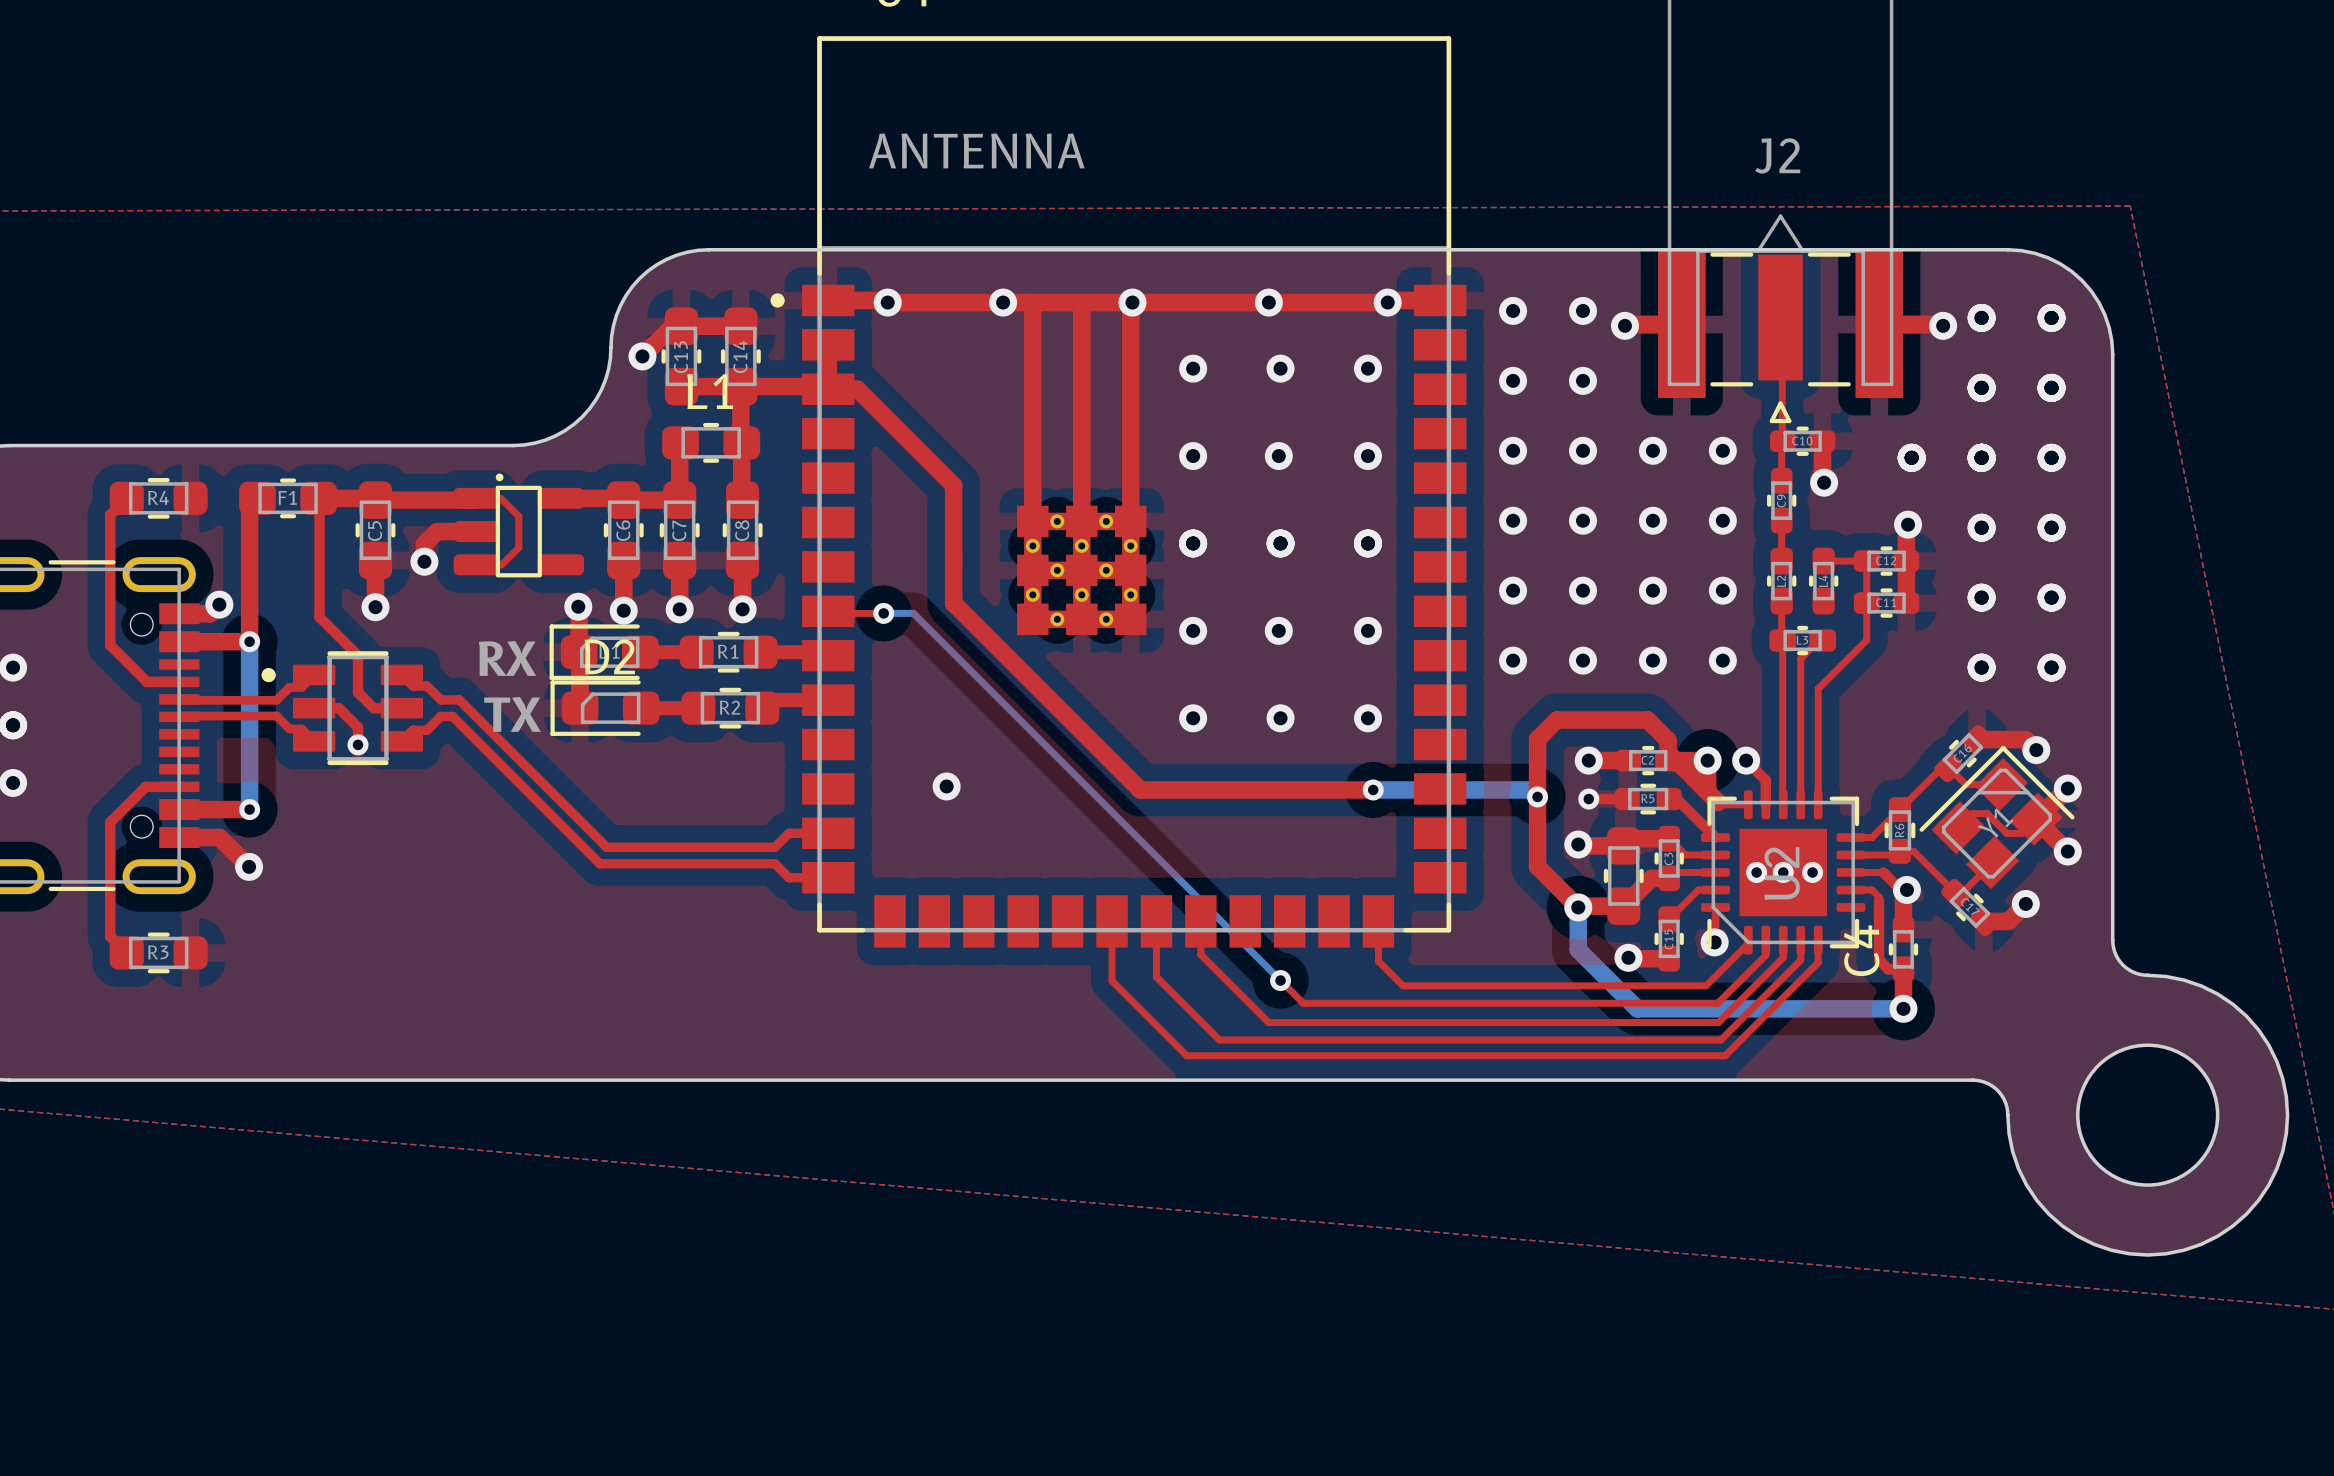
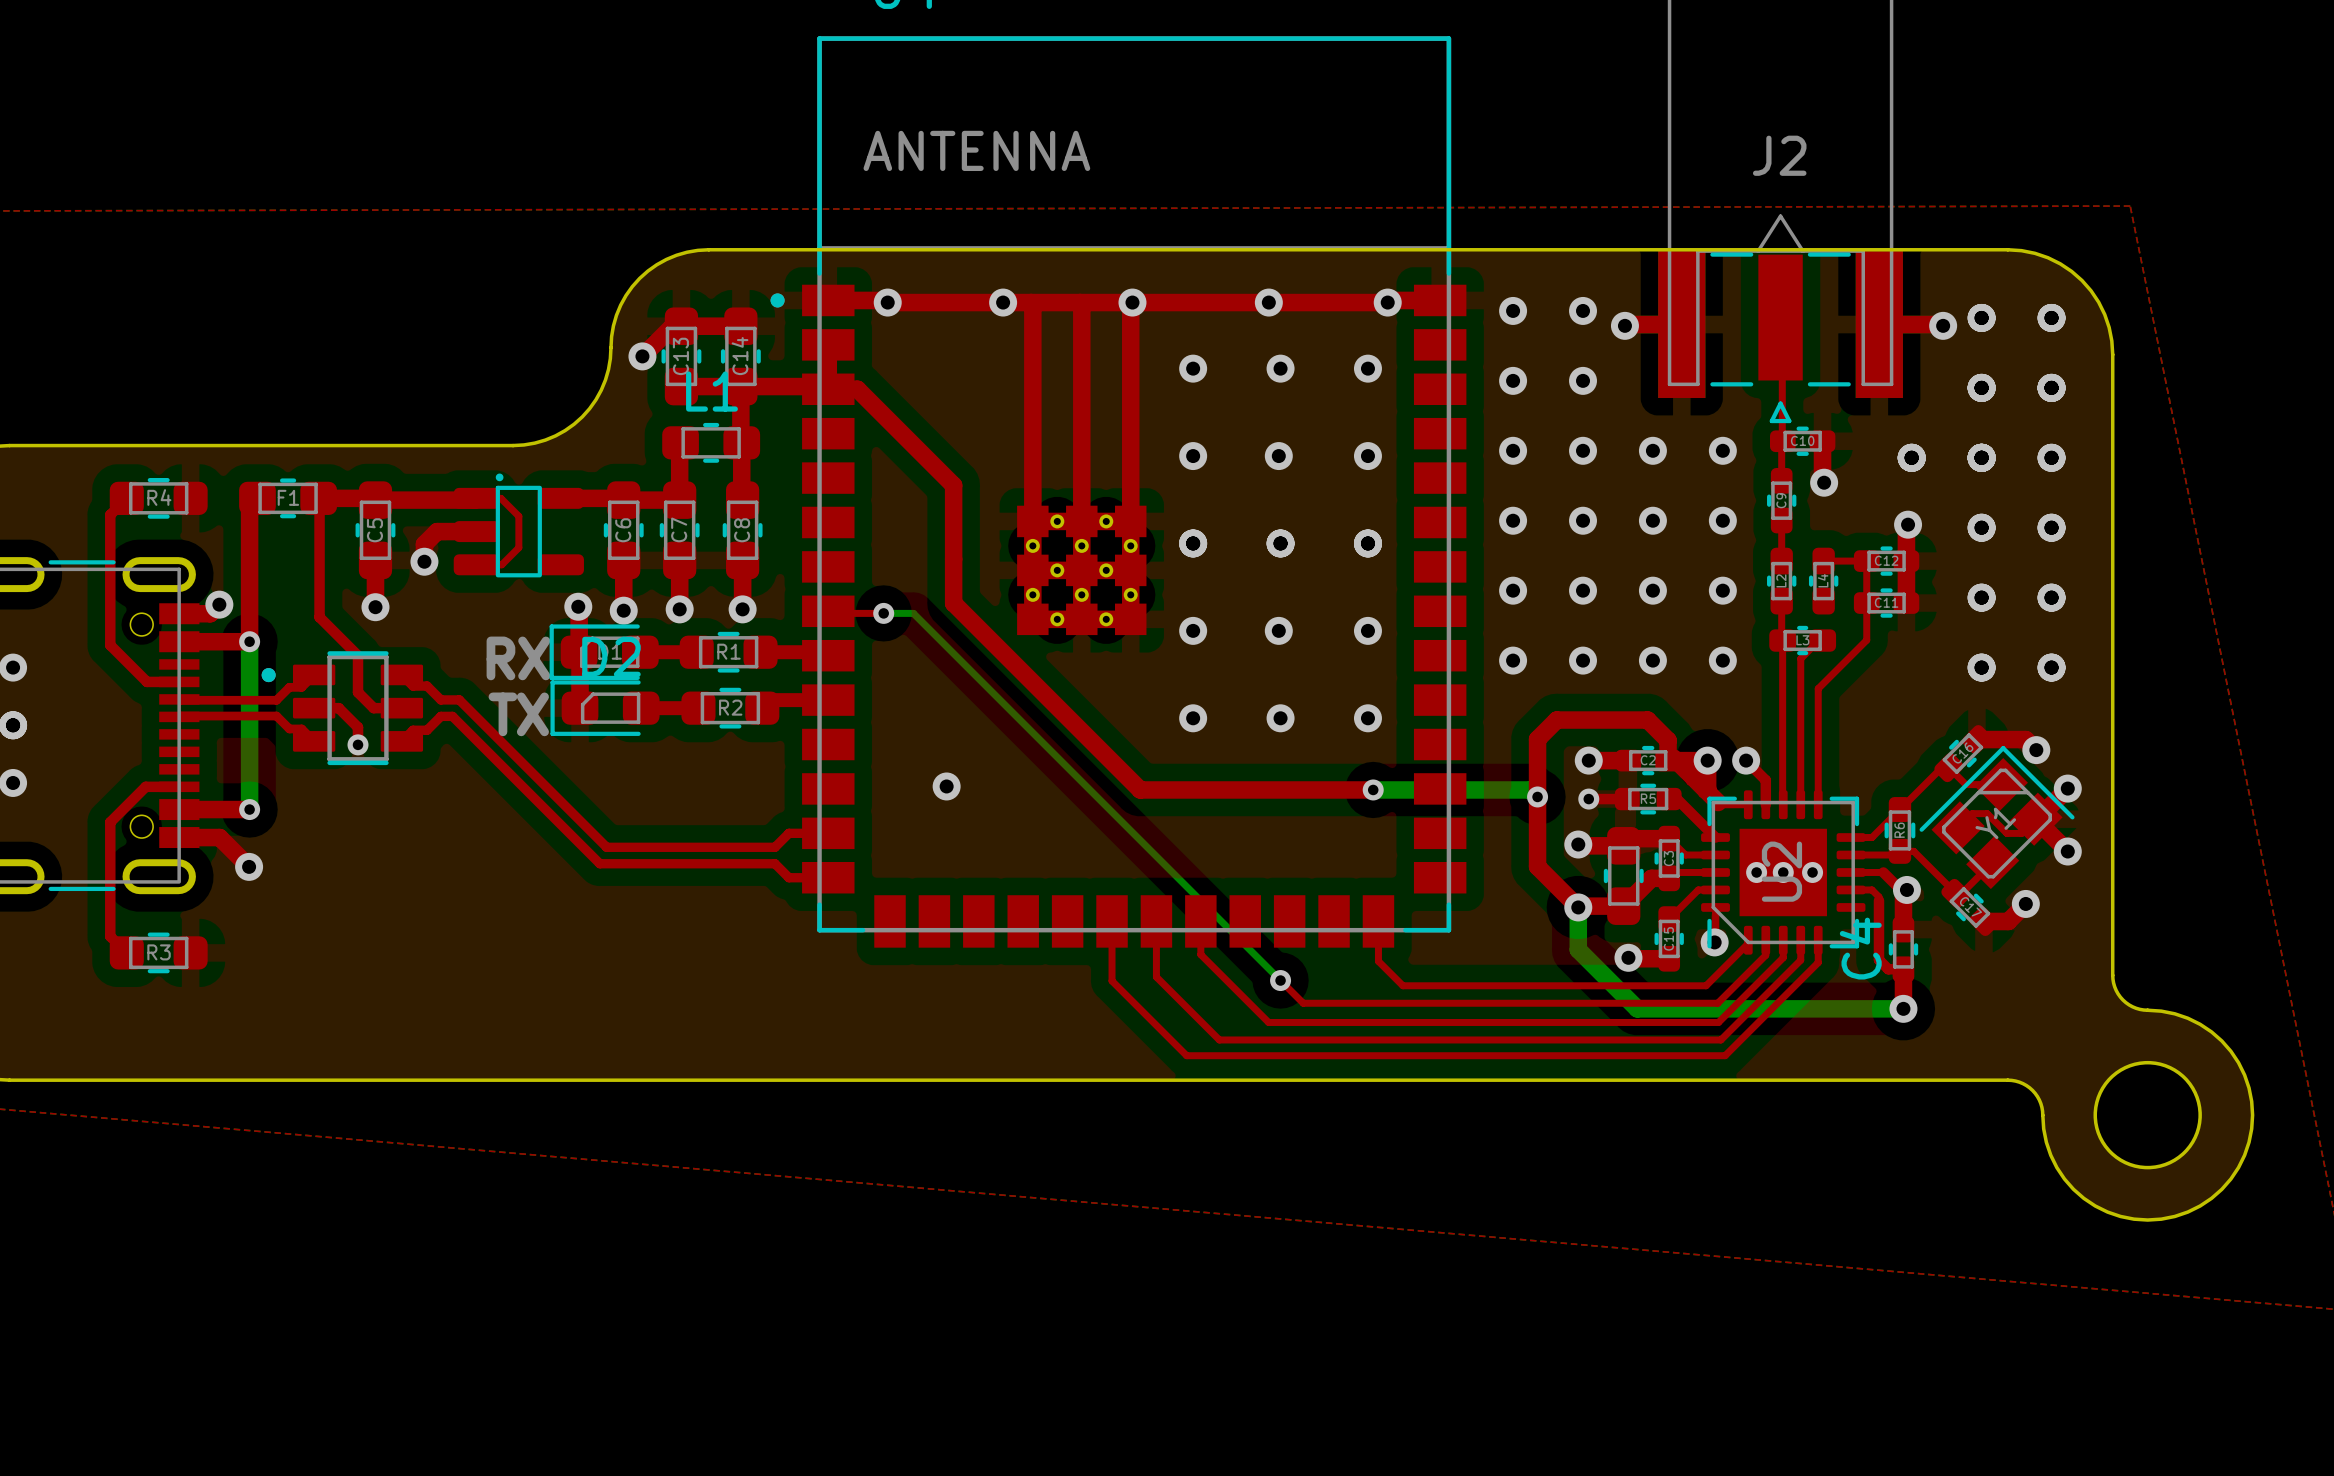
board edge: (2112, 940) (2118, 958) (2132, 971) (2183, 980) (2217, 994) (2232, 1004) (2258, 1030) (2276, 1061) (2286, 1096) (2286, 1133) (2282, 1151) (2268, 1185) (2246, 1214) (2217, 1236) (2183, 1250) (2165, 1253) (2129, 1253) (2094, 1244) (2062, 1226) (2036, 1200) (2018, 1168) (2012, 1151) (2004, 1099) (1991, 1085) (1972, 1080) -> (2112, 940) (2113, 983) (2122, 1000) (2136, 1008) (2174, 1013) (2200, 1024) (2221, 1040) (2238, 1062) (2244, 1075) (2251, 1101) (2252, 1115) (2249, 1142) (2238, 1167) (2221, 1189) (2200, 1205) (2174, 1216) (2161, 1219) (2134, 1219) (2107, 1212) (2083, 1198) (2073, 1189) (2056, 1167) (2046, 1142) (2040, 1103) (2032, 1090) (2015, 1081) (1972, 1080)
round board edge size: [2076, 1043, 2220, 1187] -> [2093, 1060, 2202, 1170]

